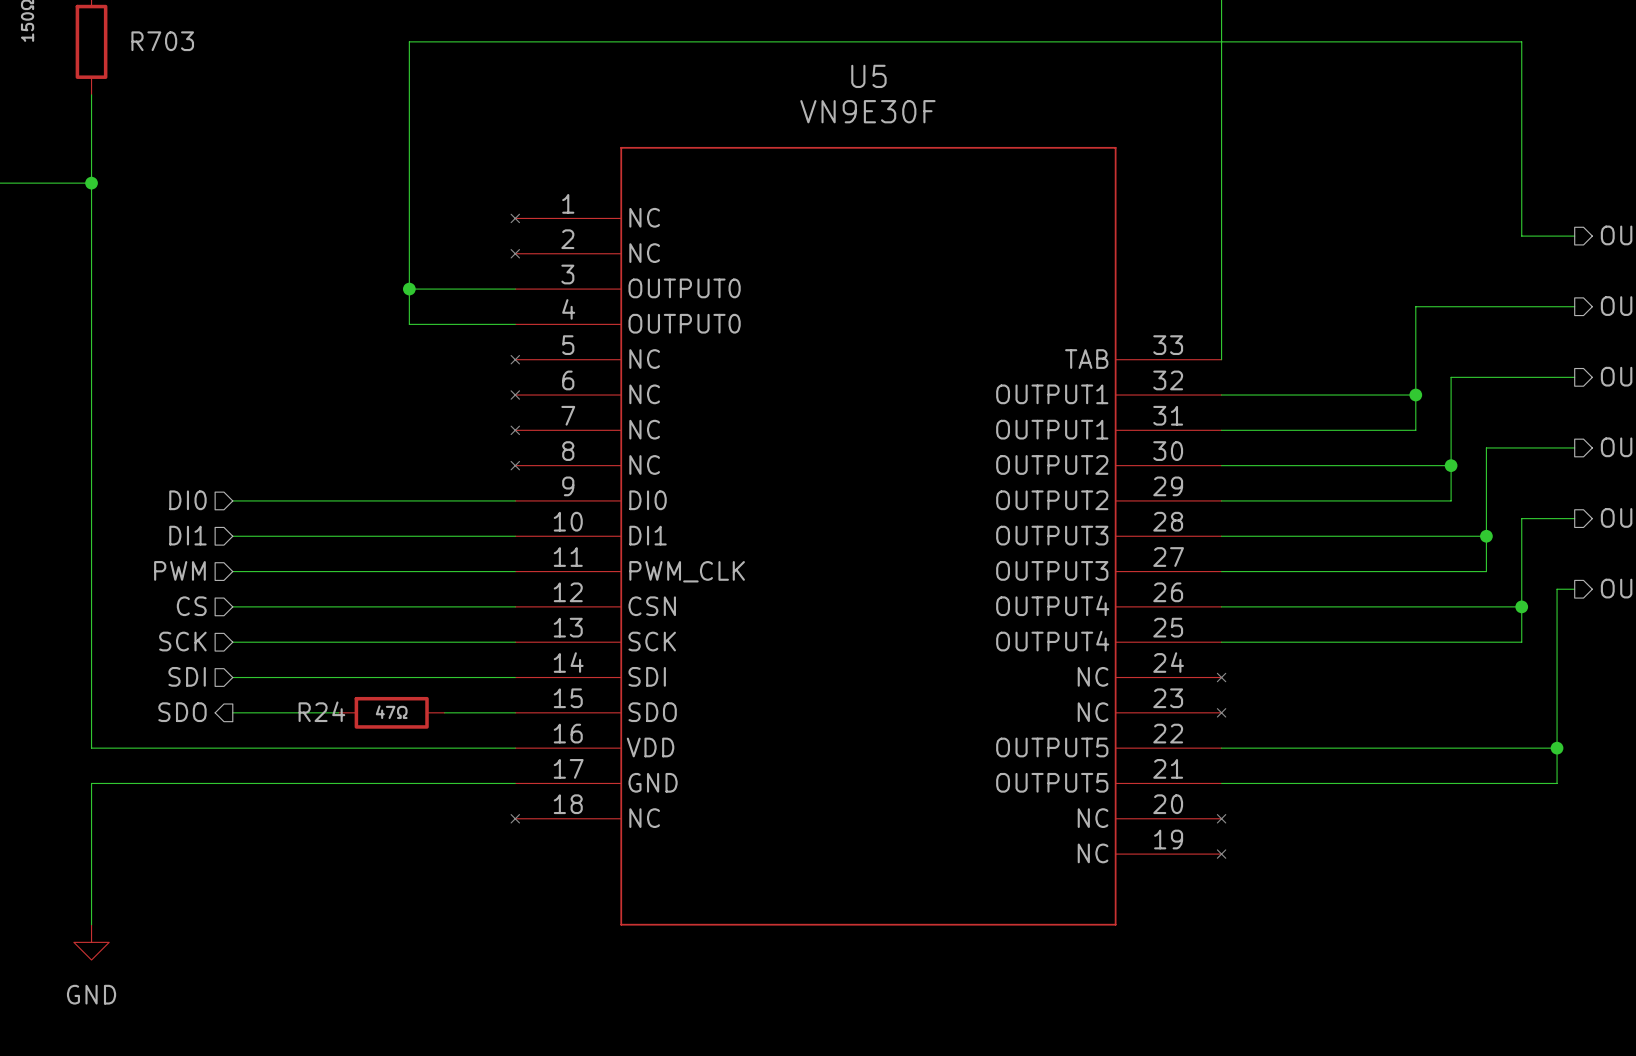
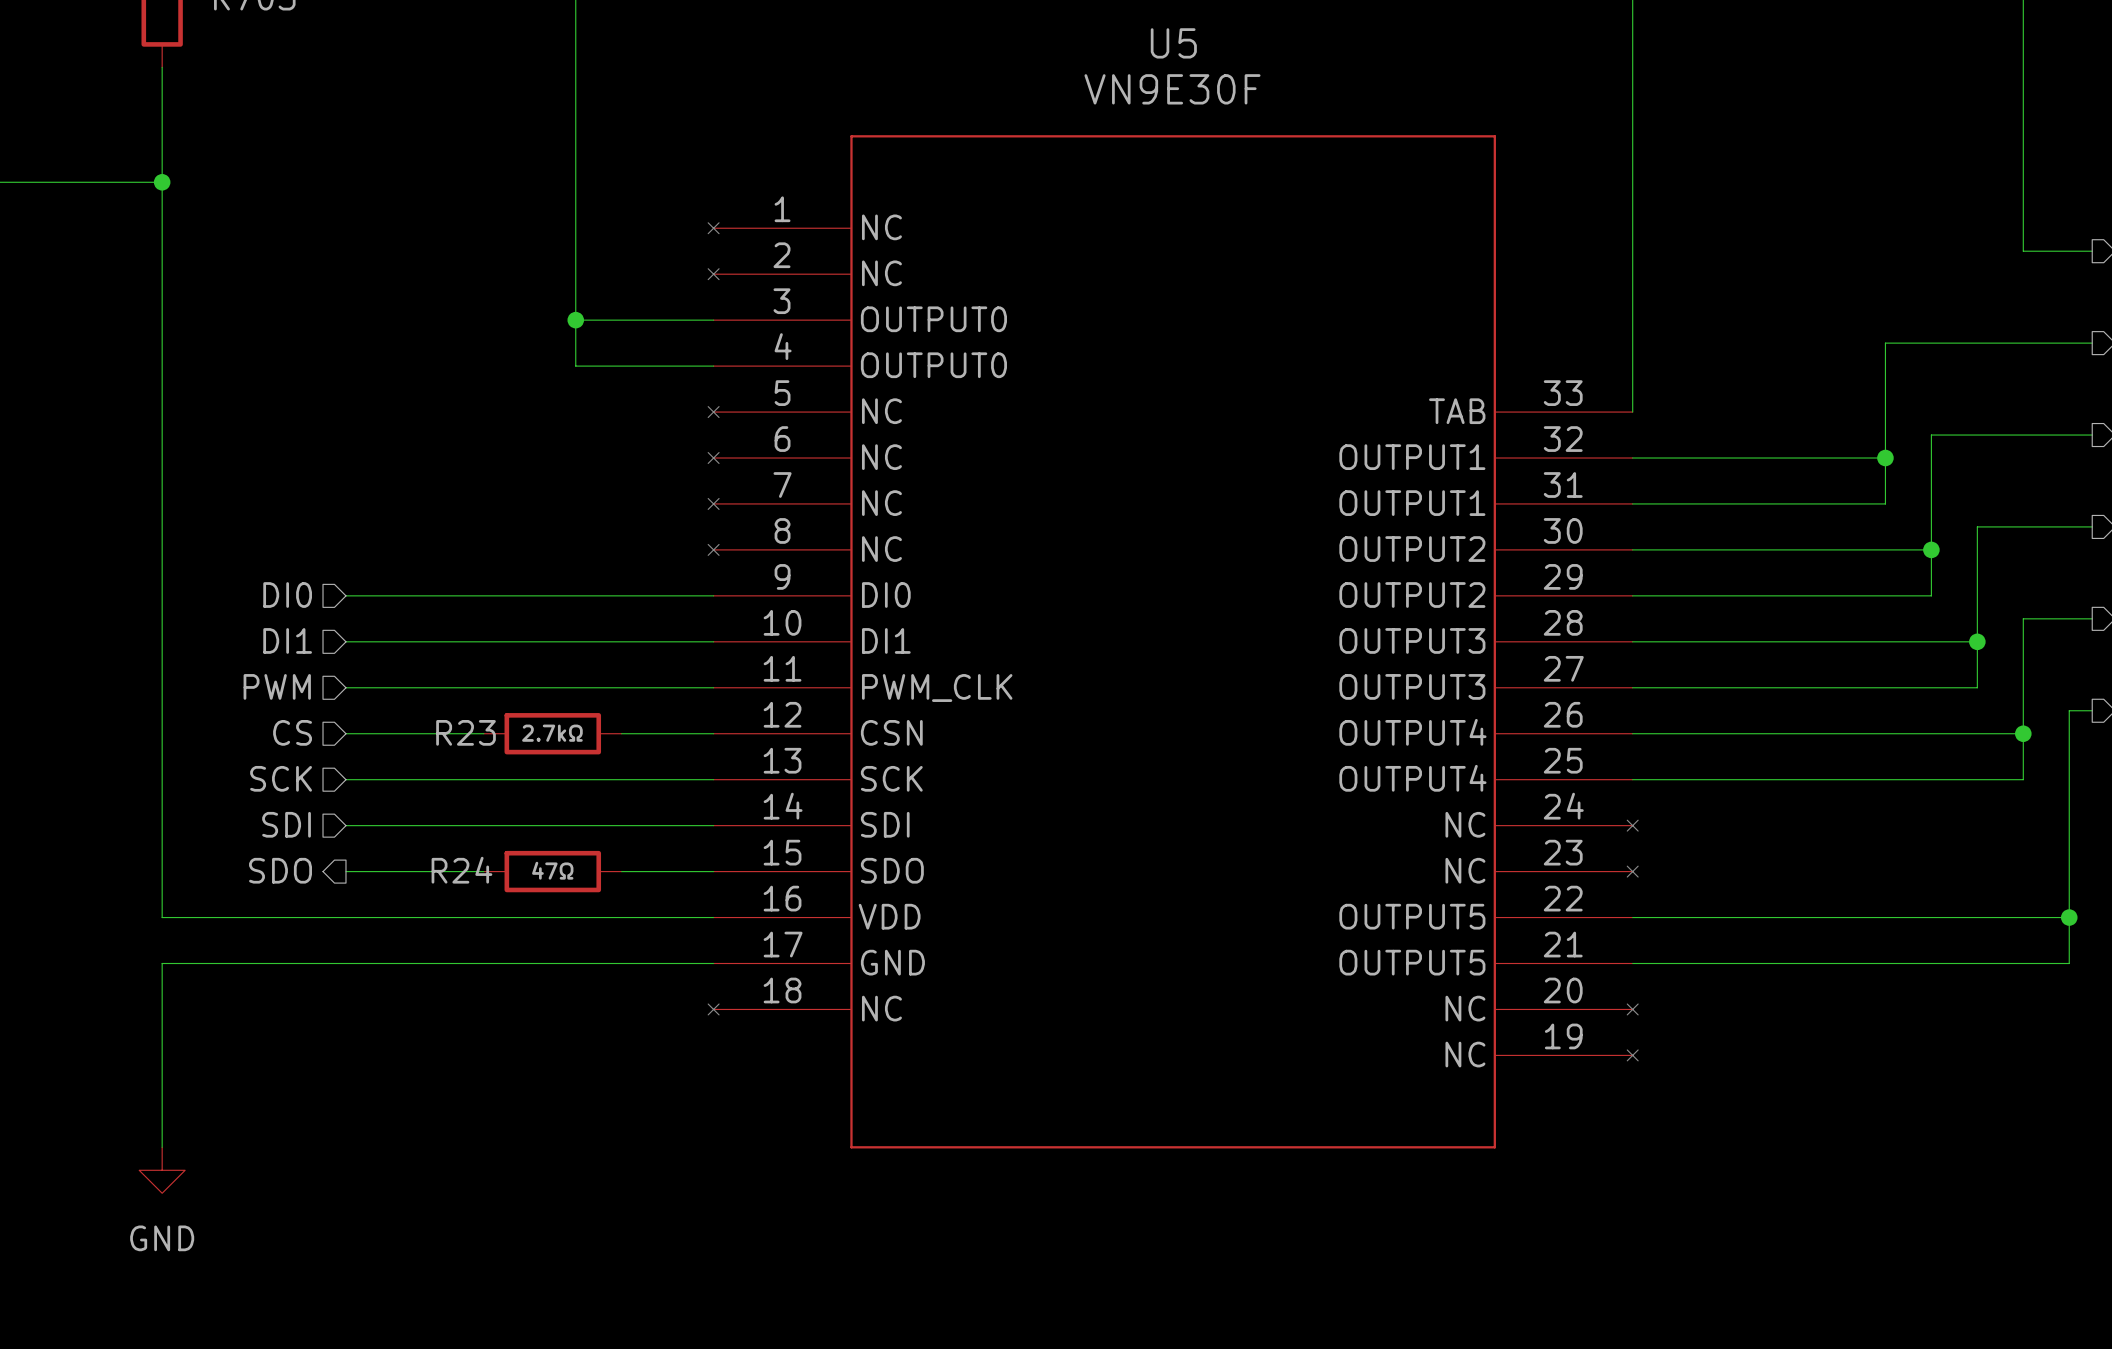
wire: (338, 606) (444, 606) -> none
R23: none -> 2.7kΩ (552, 733)

